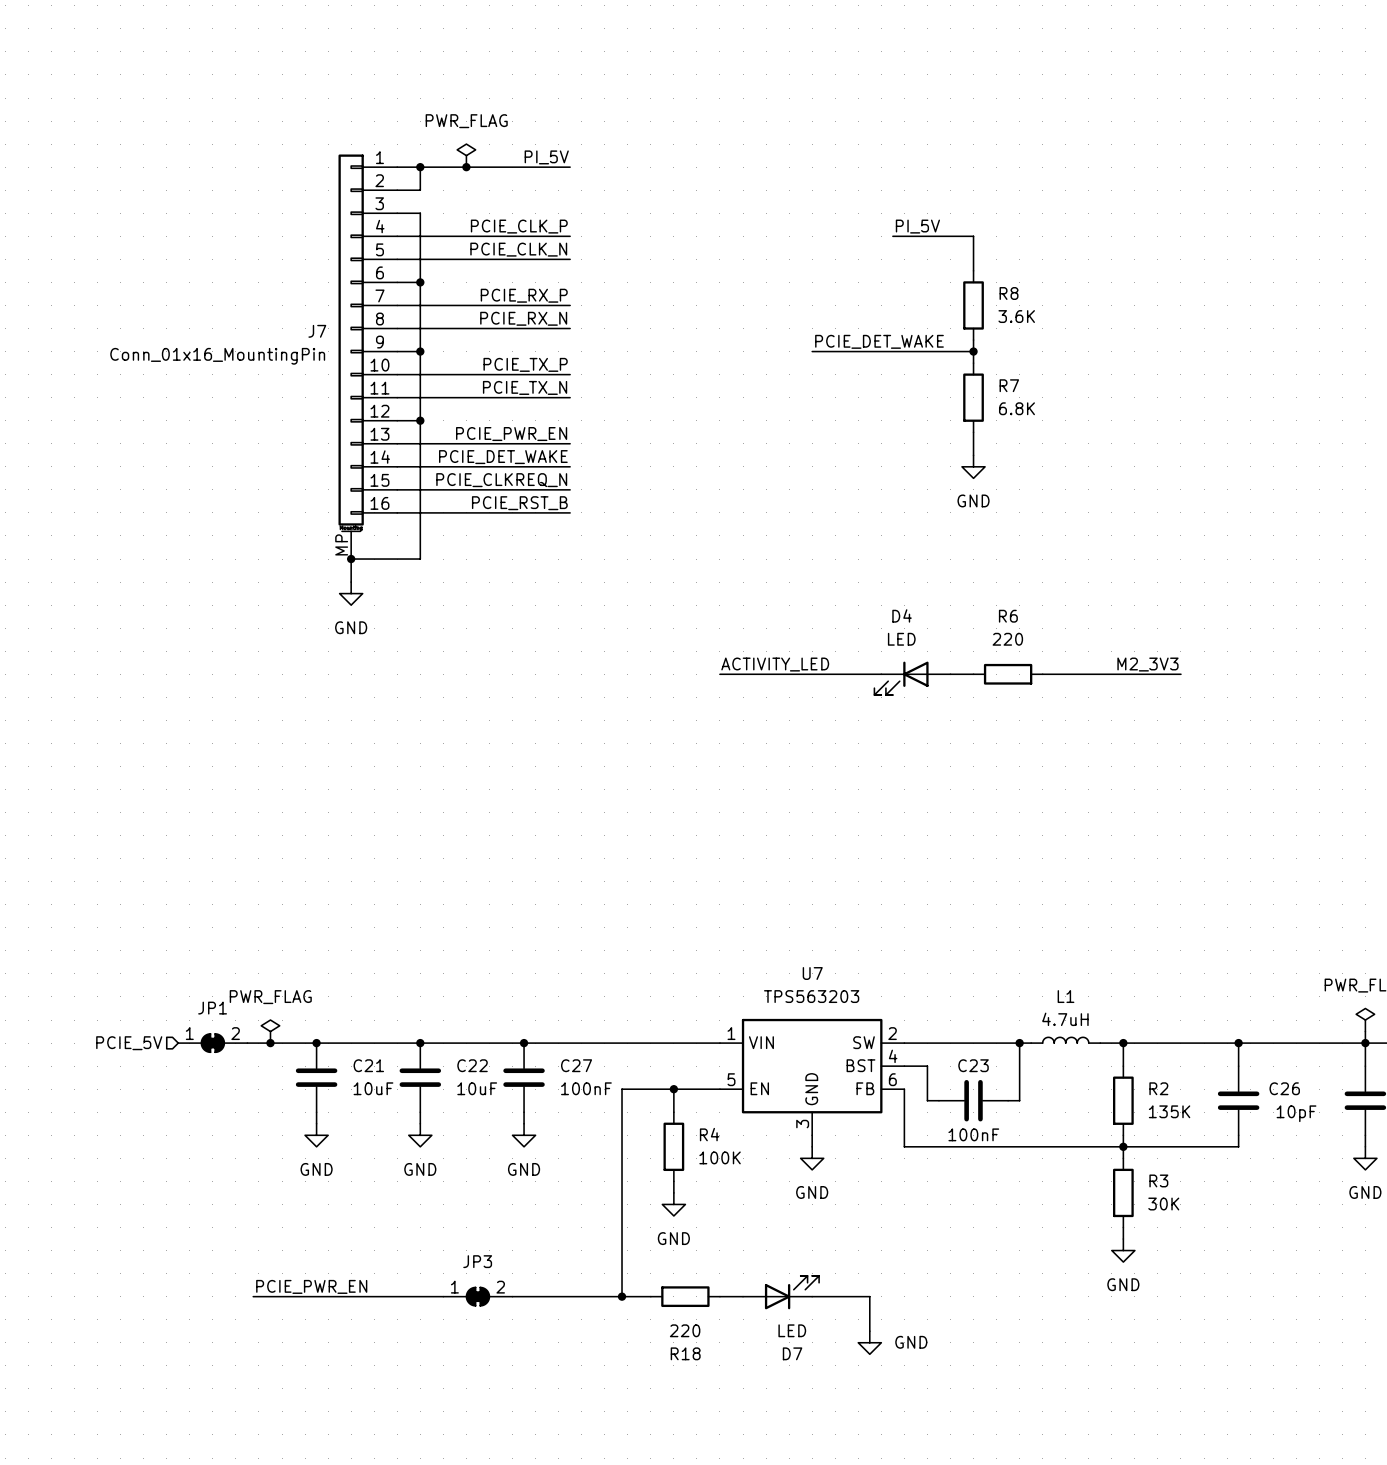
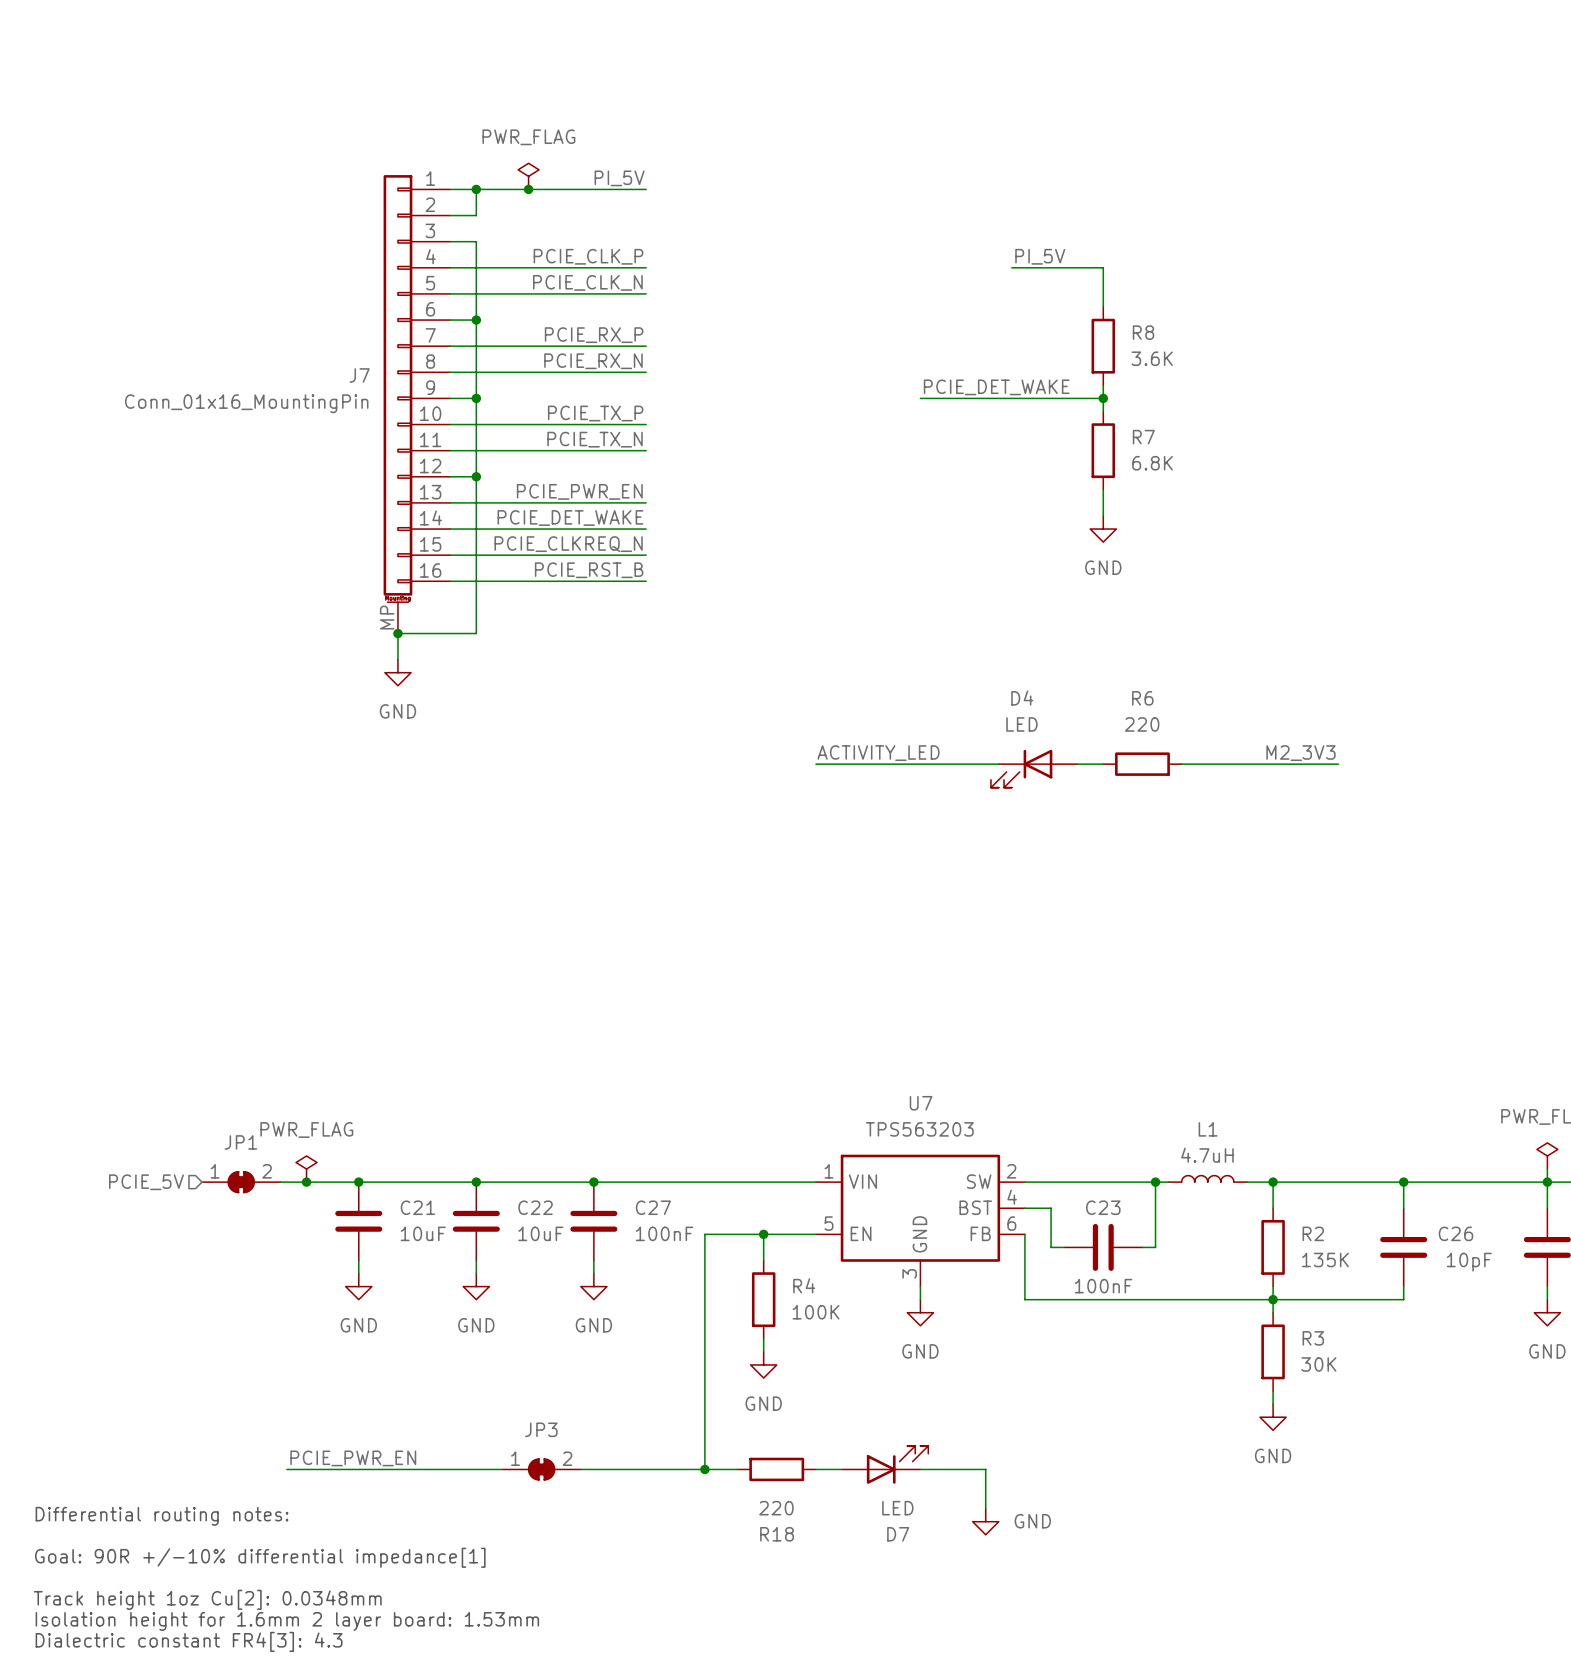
text: none -> Differential routing notes: (162, 1516)
text: none -> Goal: 90R +/-10% differential impedance[1] (260, 1557)
text: none -> Track height 1oz Cu[2]: 0.0348mm (207, 1599)
text: none -> Isolation height for 1.6mm 2 layer board: 1.53mm (287, 1621)
text: none -> Dialectric constant FR4[3]: 4.3 (189, 1641)

